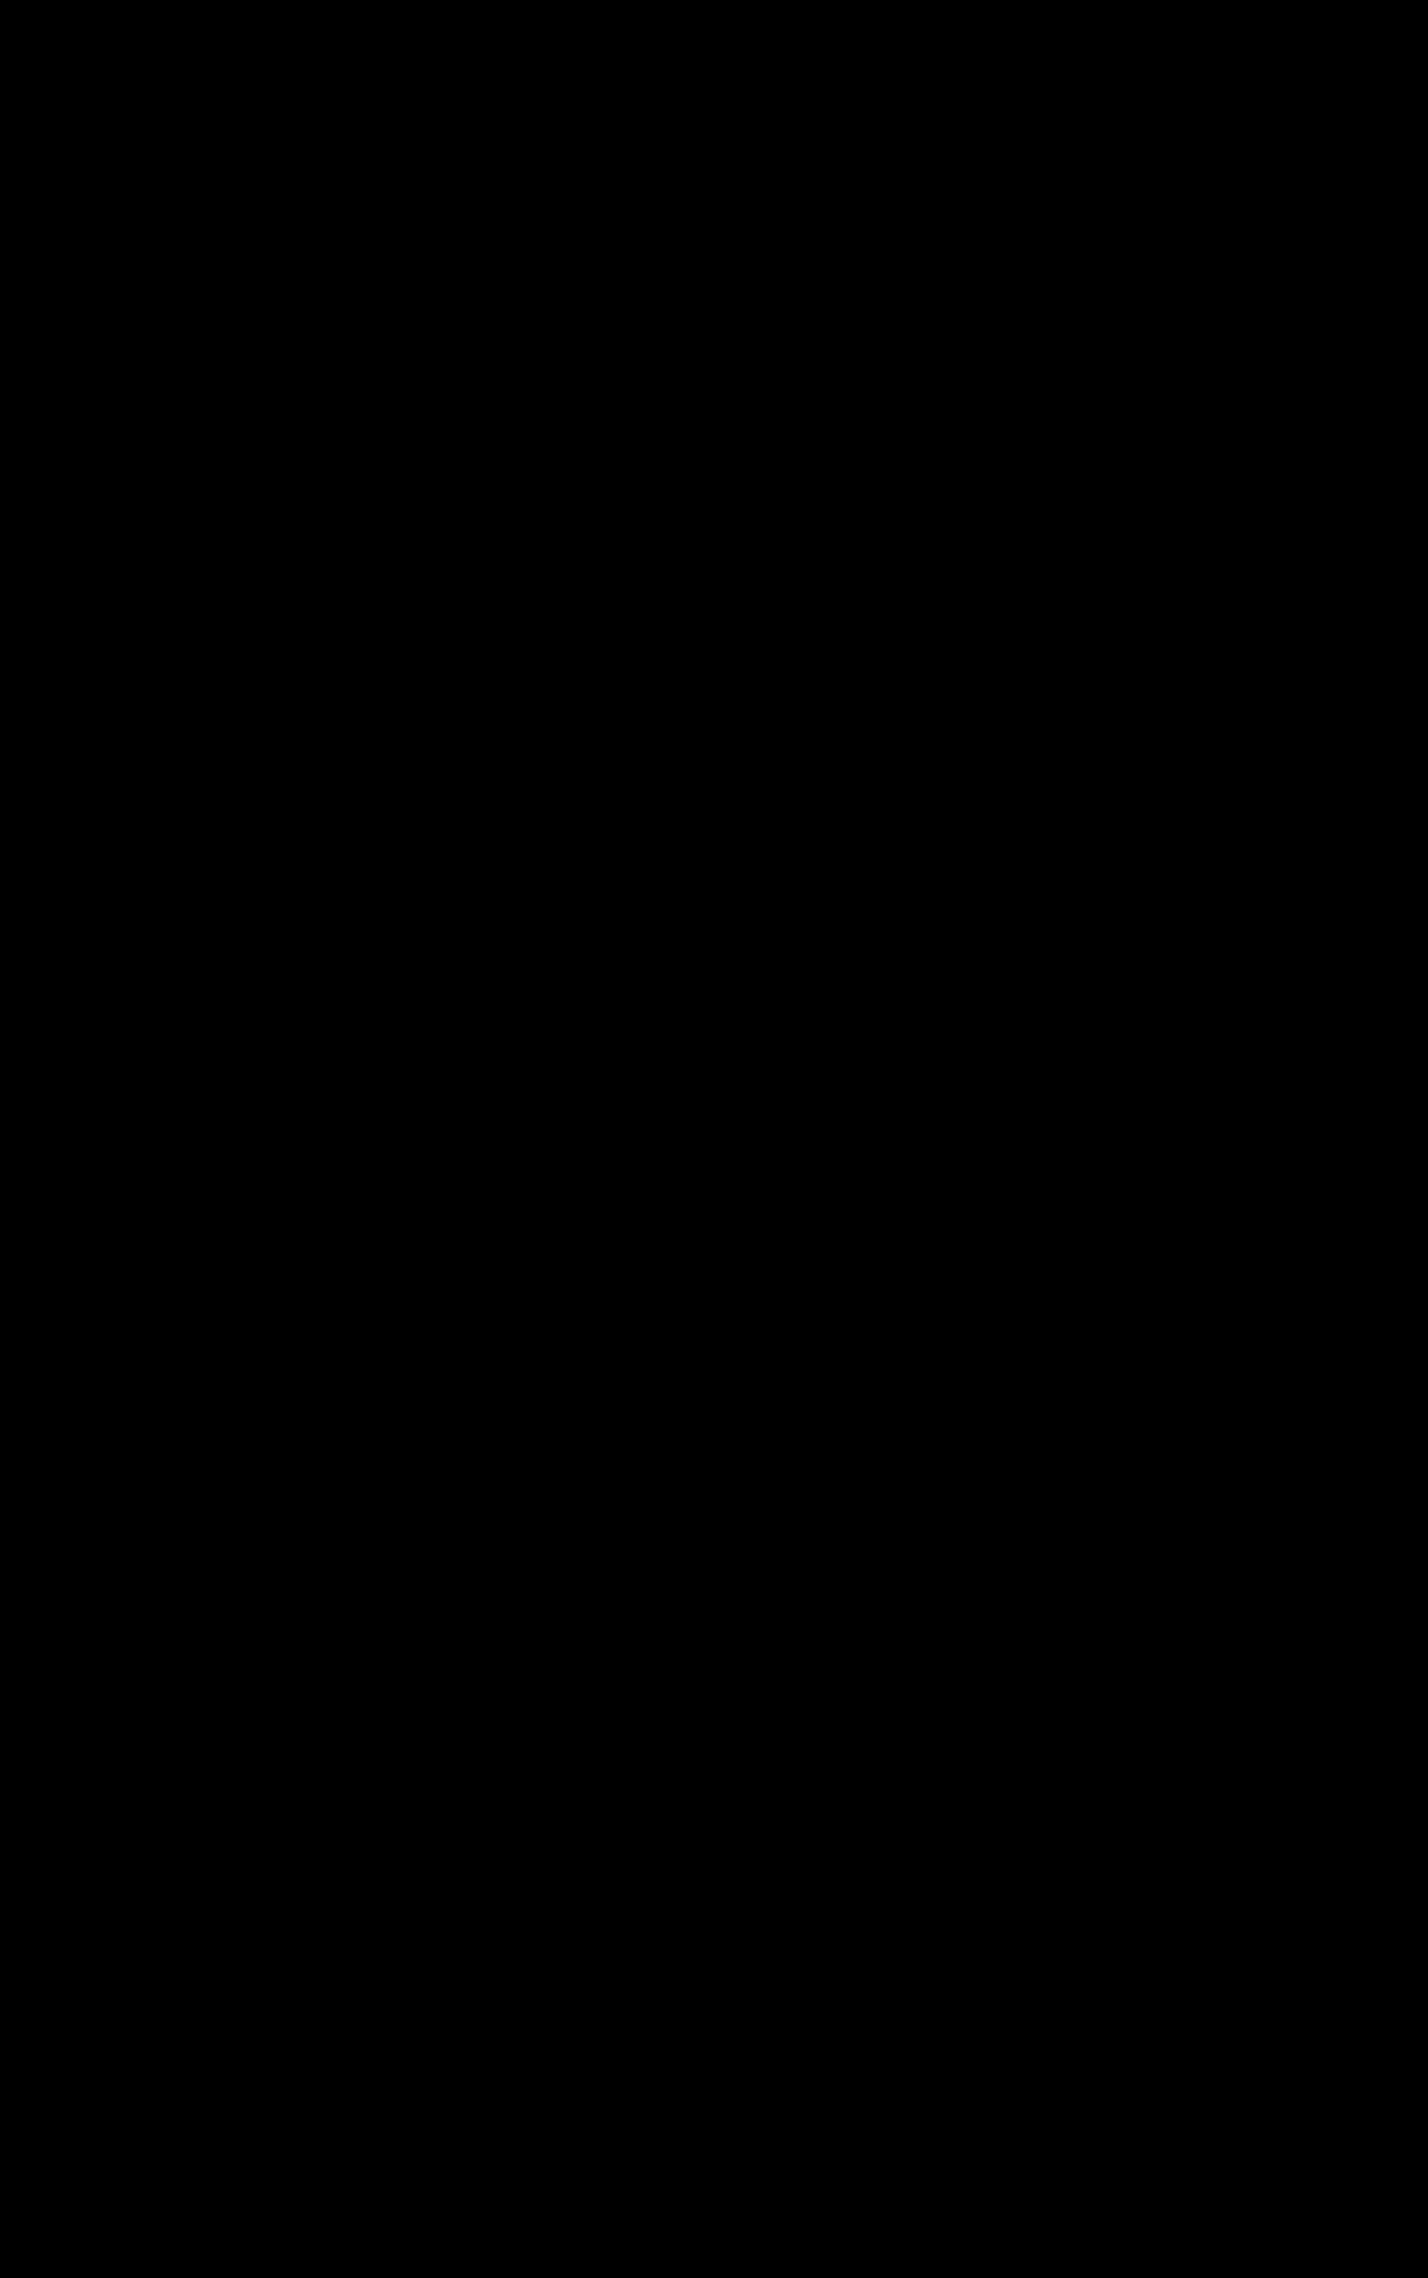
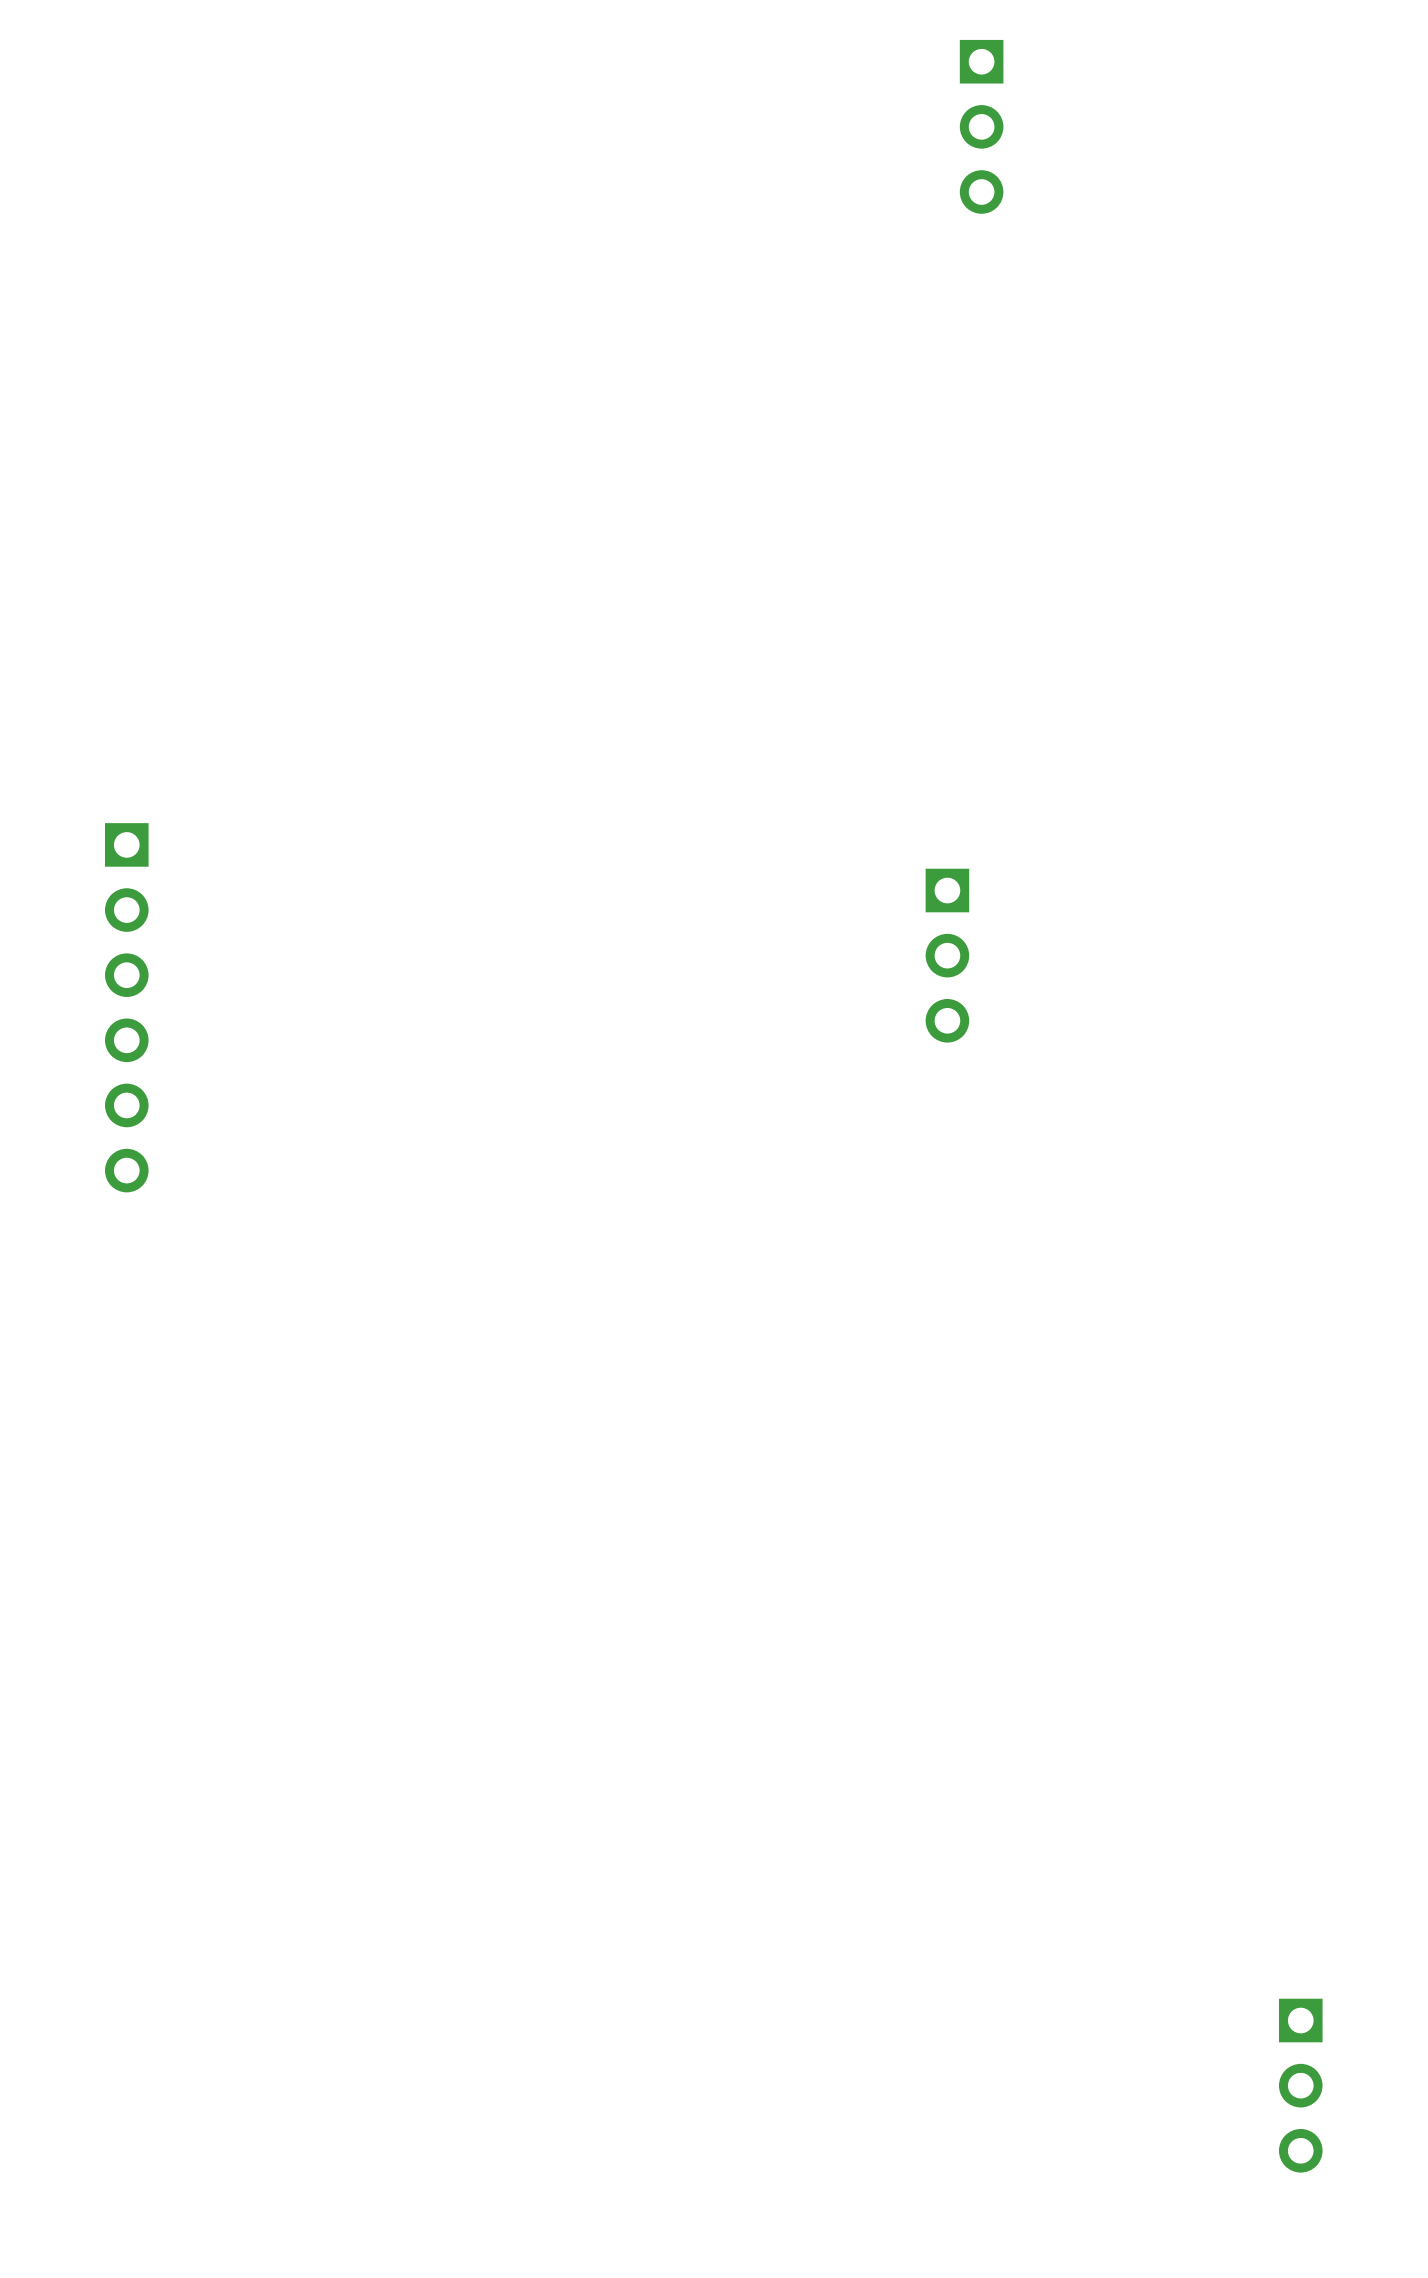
part: none -> (981, 126)
part: none -> (947, 955)
part: none -> (126, 1007)
part: none -> (1300, 2085)

